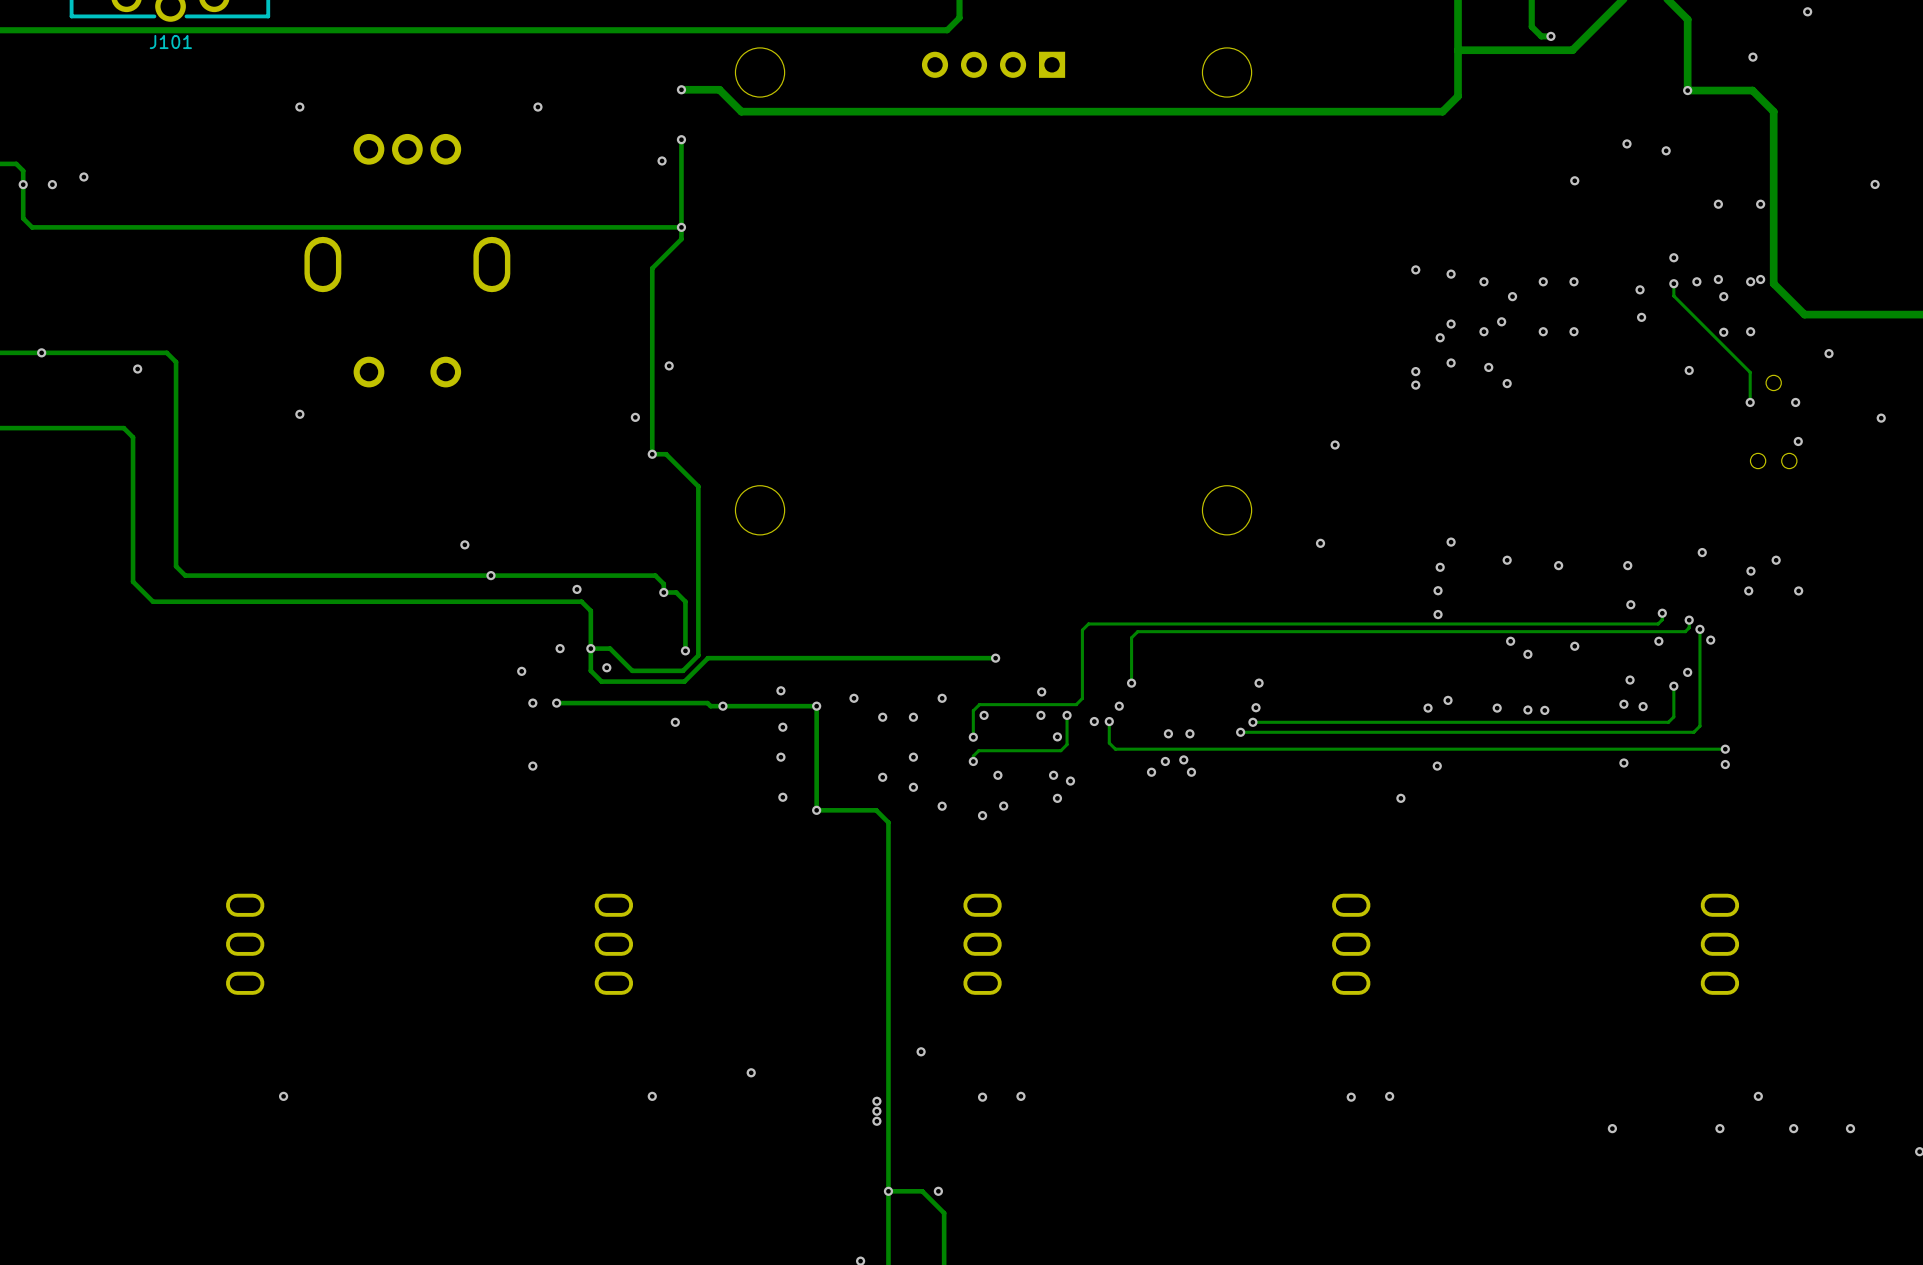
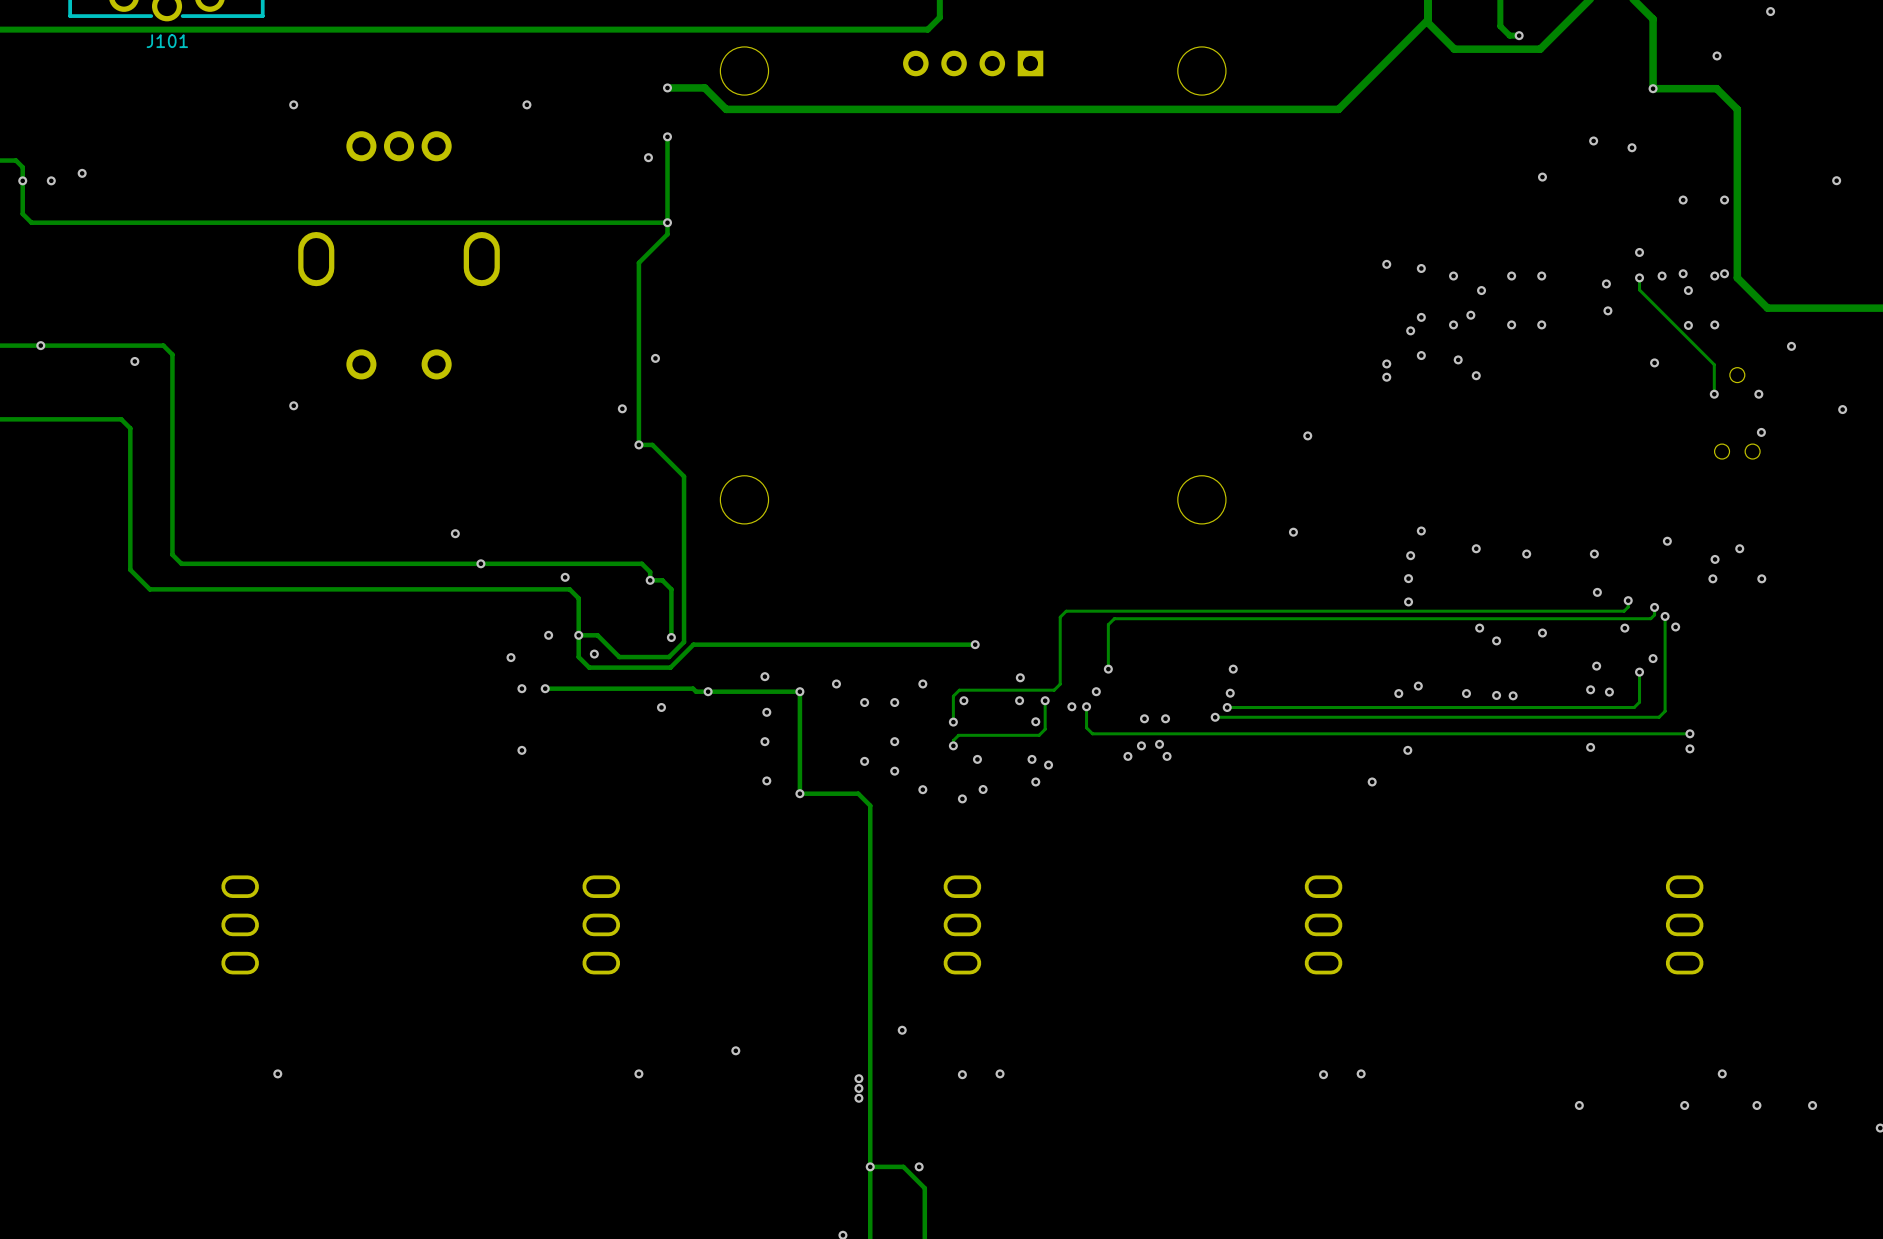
track: (1458, 23) (1458, 96) (1442, 111) (1366, 111) -> (1428, 19) (1338, 109)
track: (1484, 50) (1458, 50) -> (1454, 49) (1428, 22)

